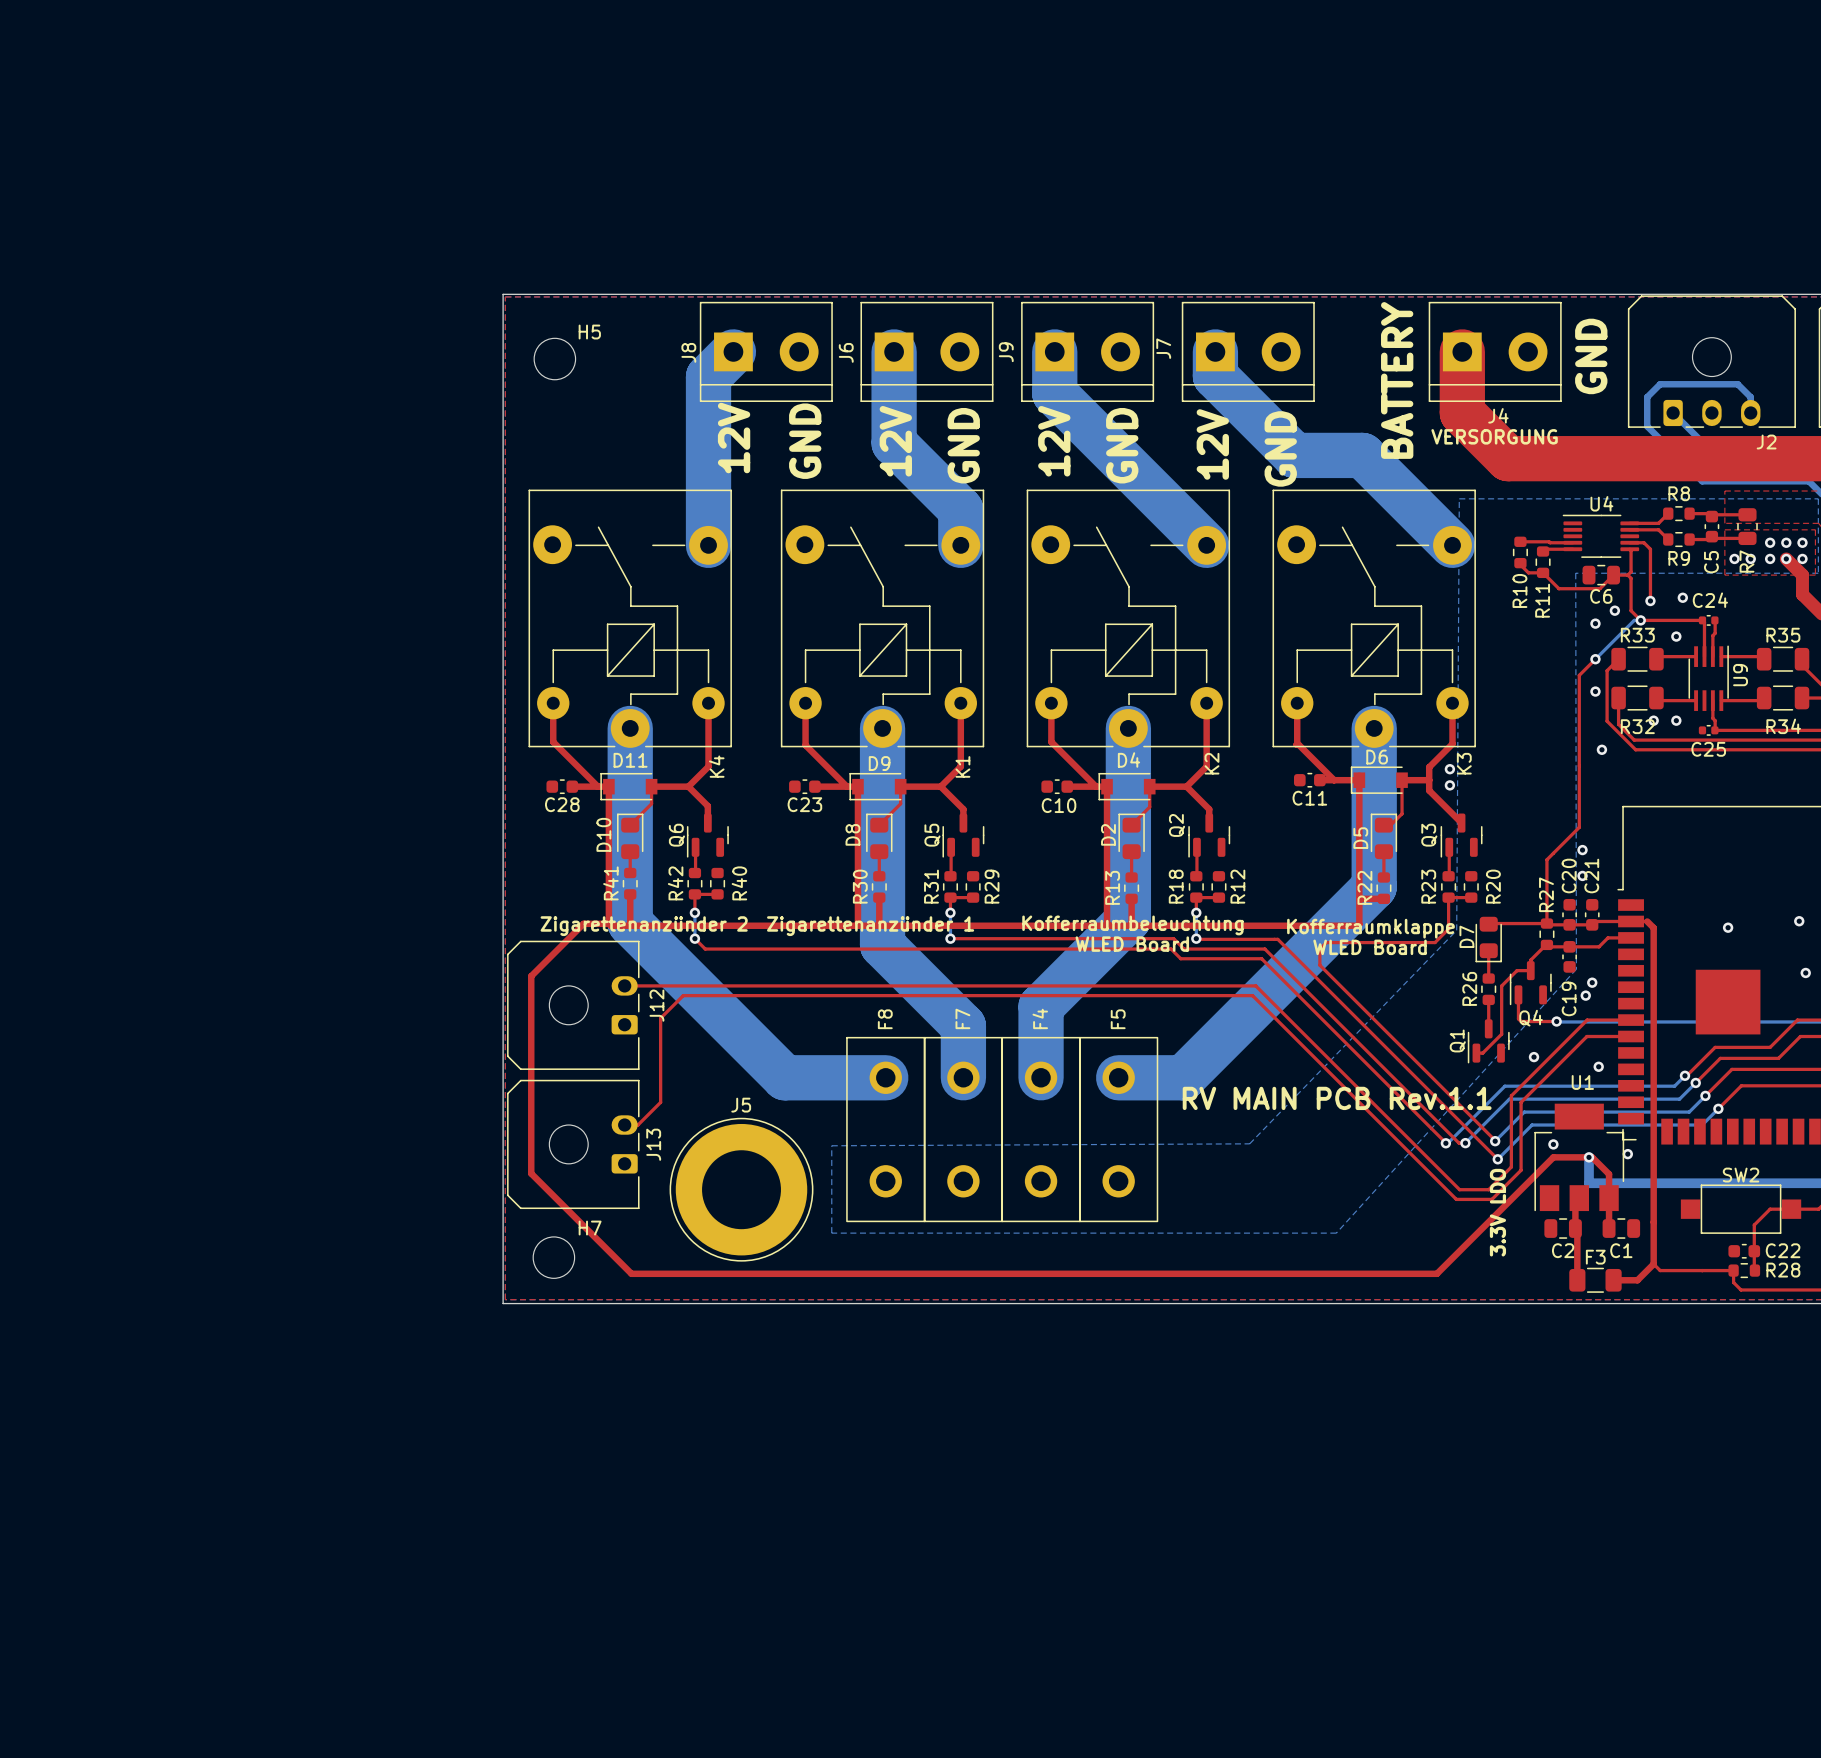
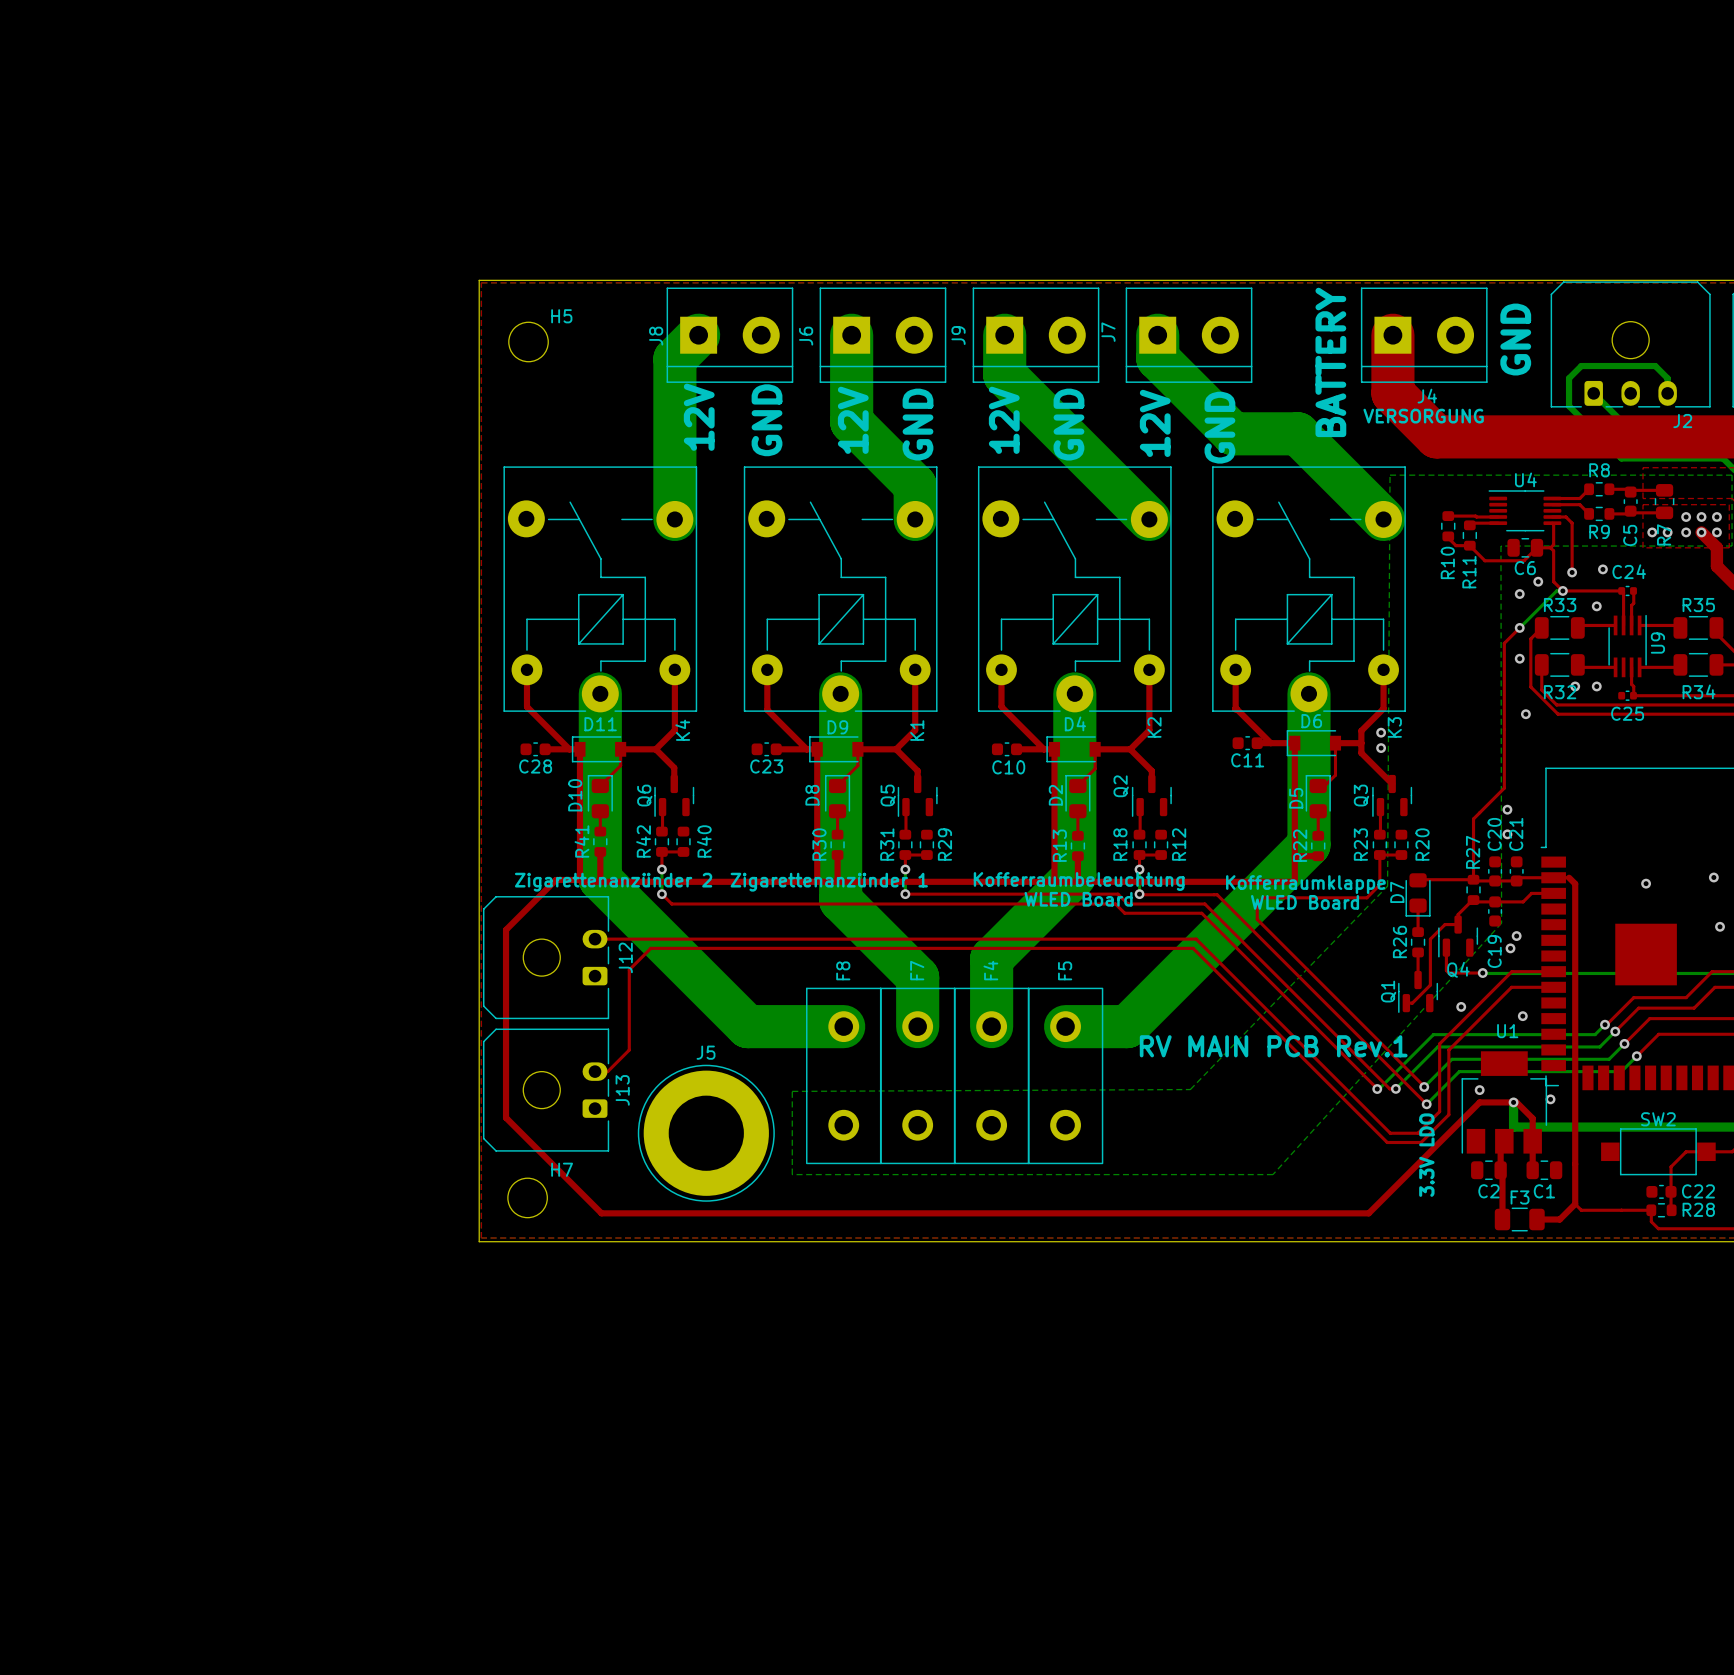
text: RV MAIN PCB Rev.1.1 (1337, 1098) -> RV MAIN PCB Rev.1 (1273, 1046)

